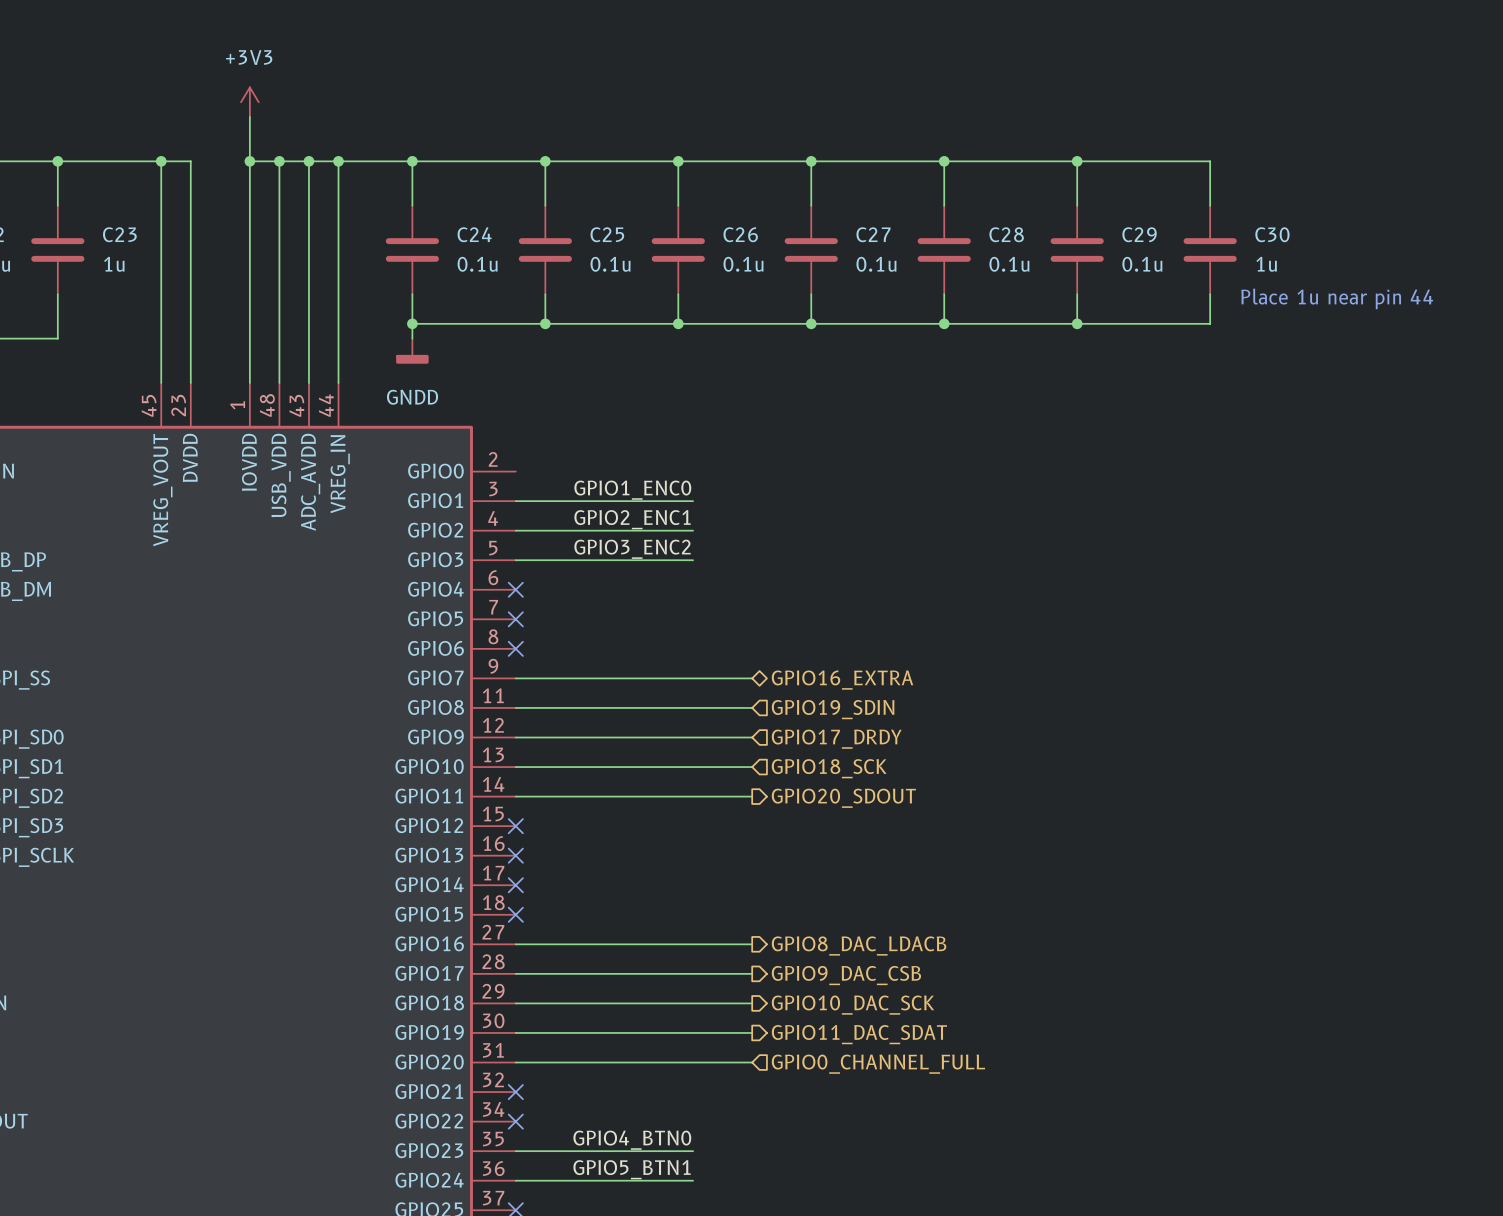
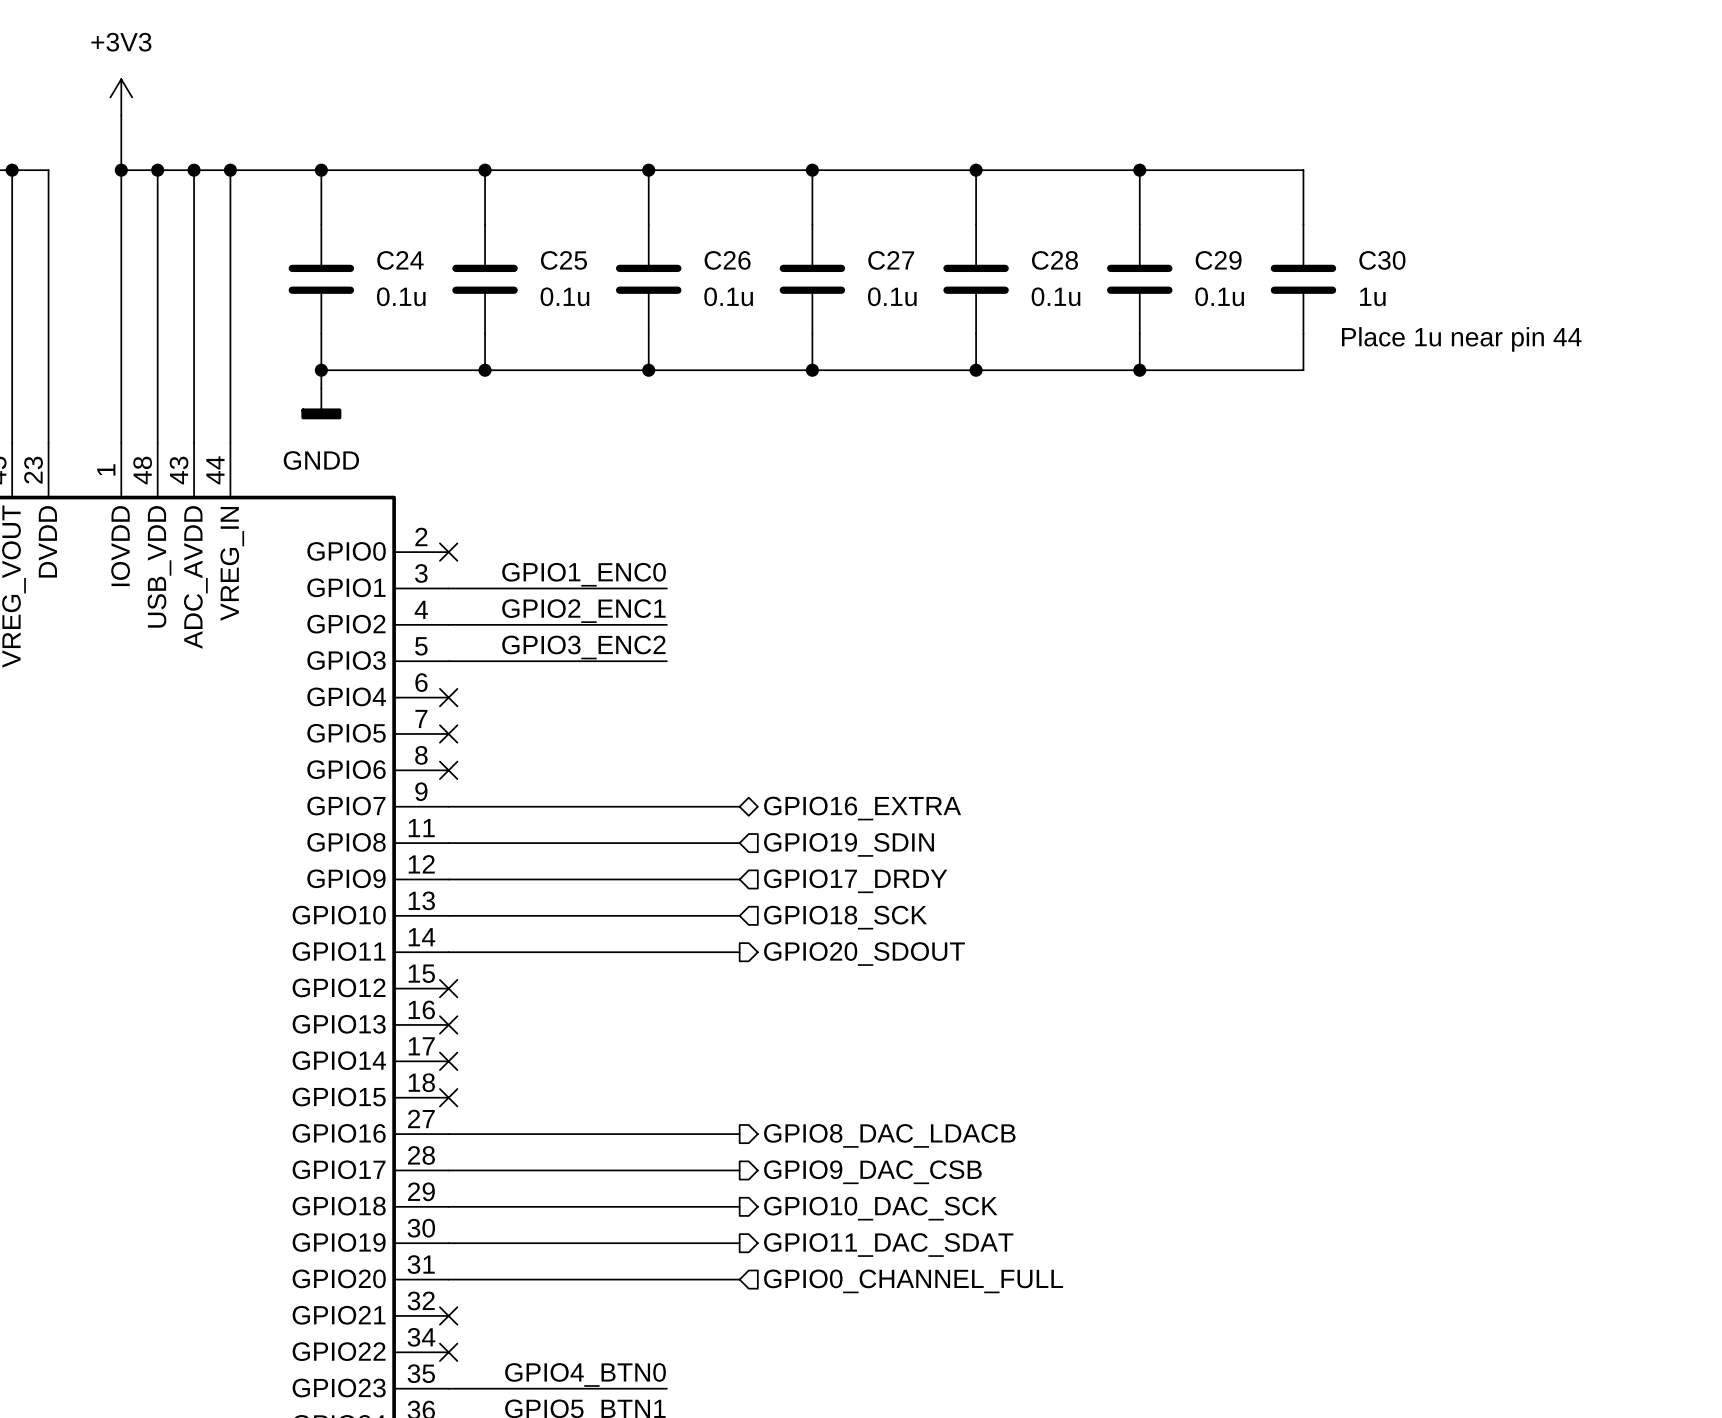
no-connect mark: none -> (448, 552)

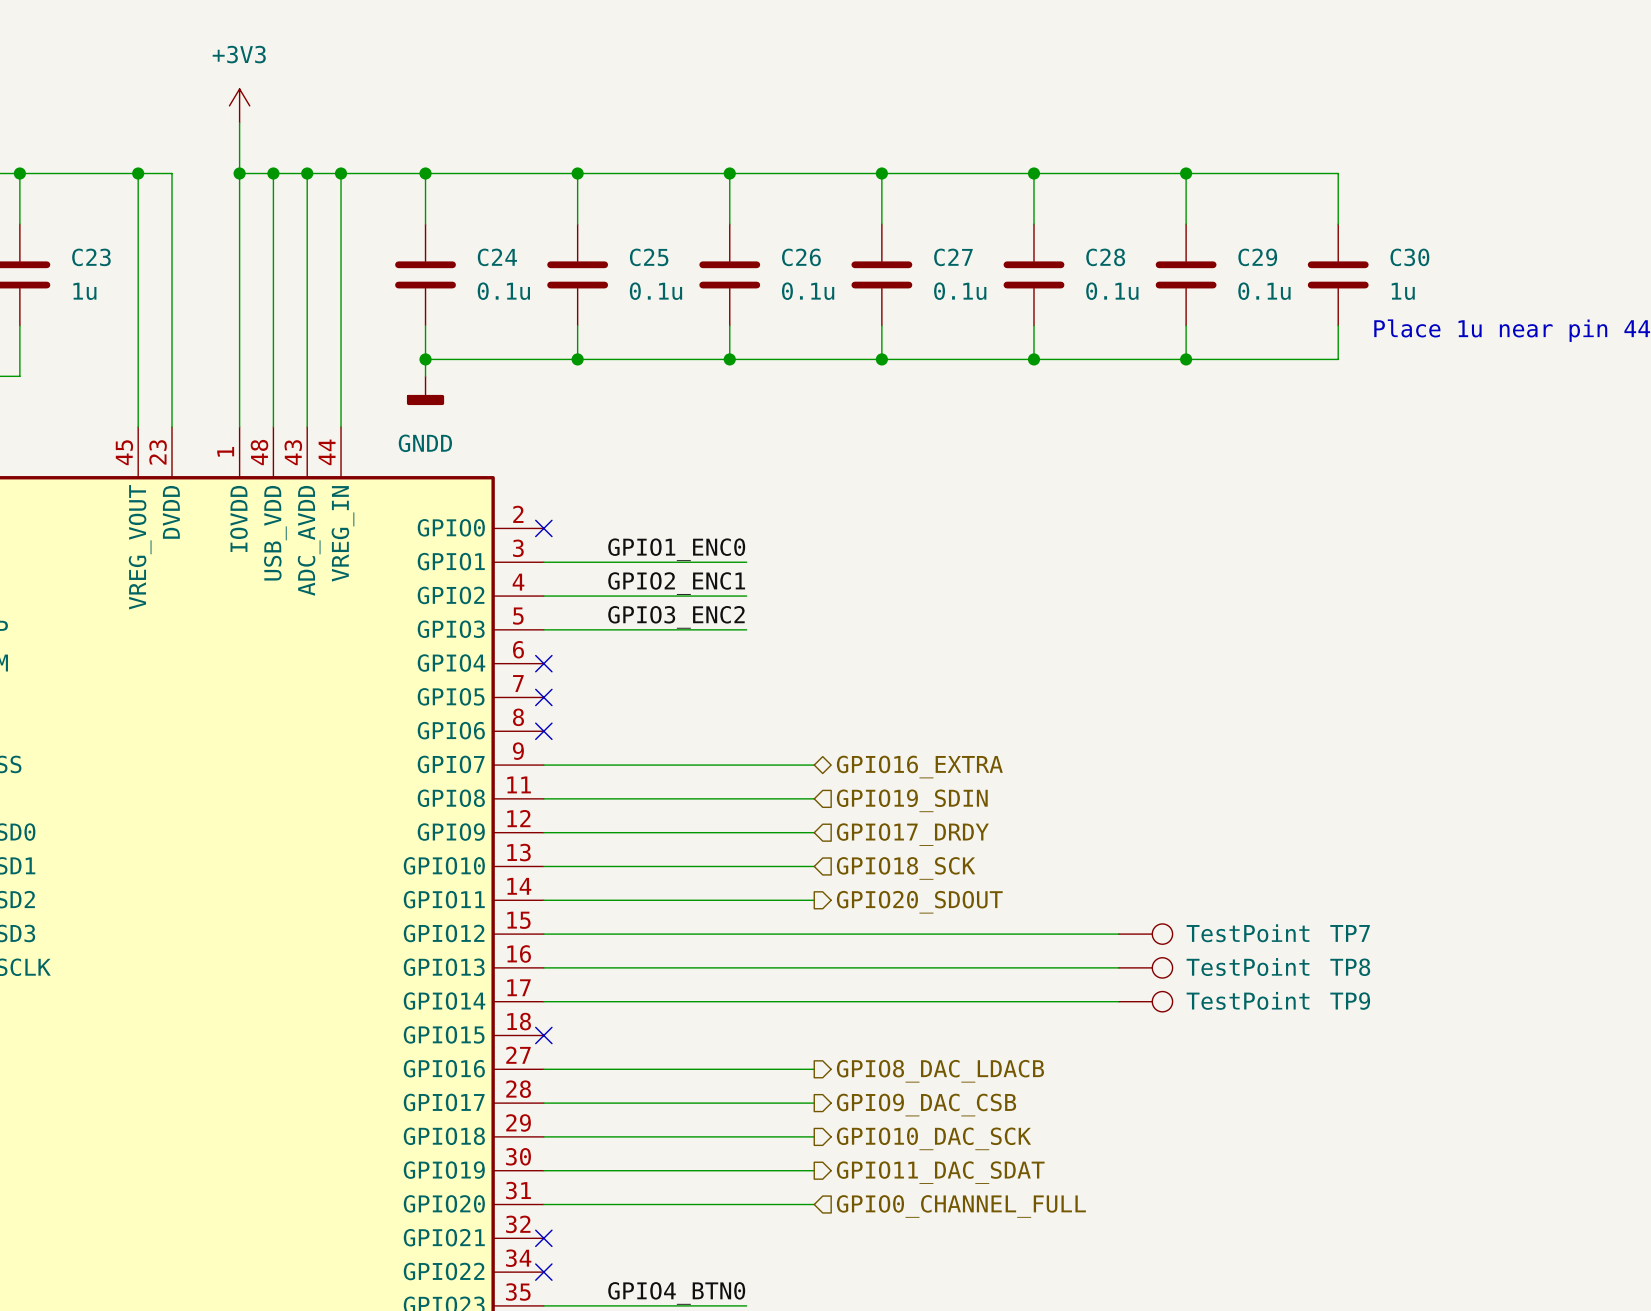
wire: none -> (543, 934) (1118, 934)
no-connect mark: (448, 988) -> none
TP7: none -> TestPoint (1145, 934)
wire: none -> (543, 967) (1118, 967)
no-connect mark: (448, 1024) -> none
TP8: none -> TestPoint (1145, 967)
wire: none -> (543, 1001) (1118, 1001)
no-connect mark: (448, 1061) -> none
TP9: none -> TestPoint (1145, 1001)

